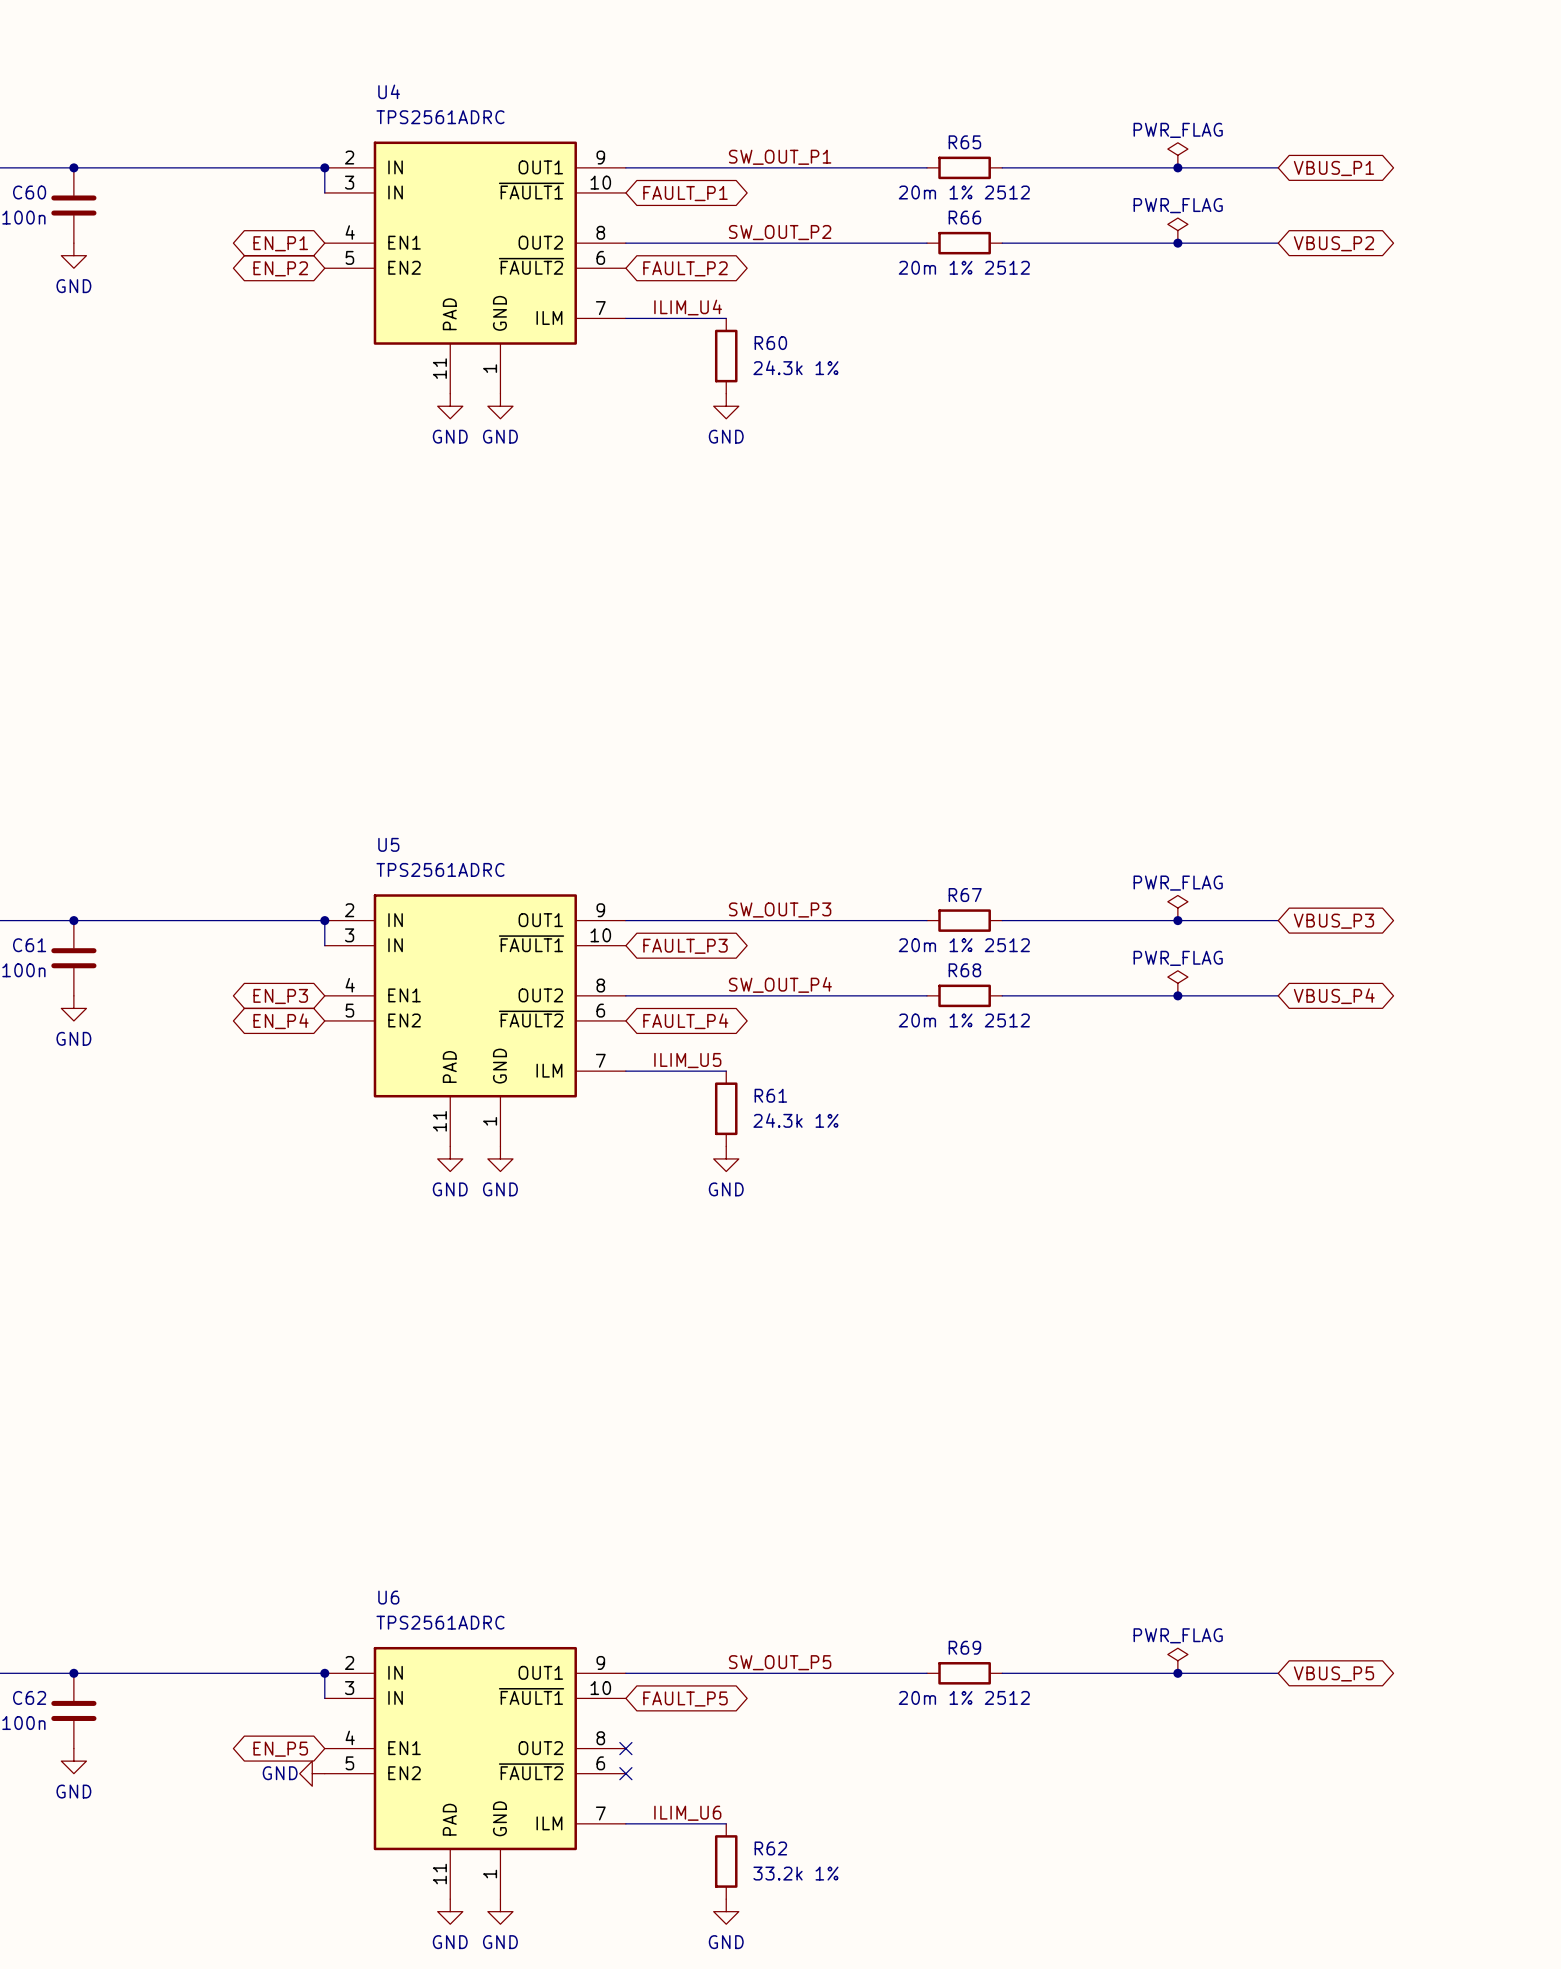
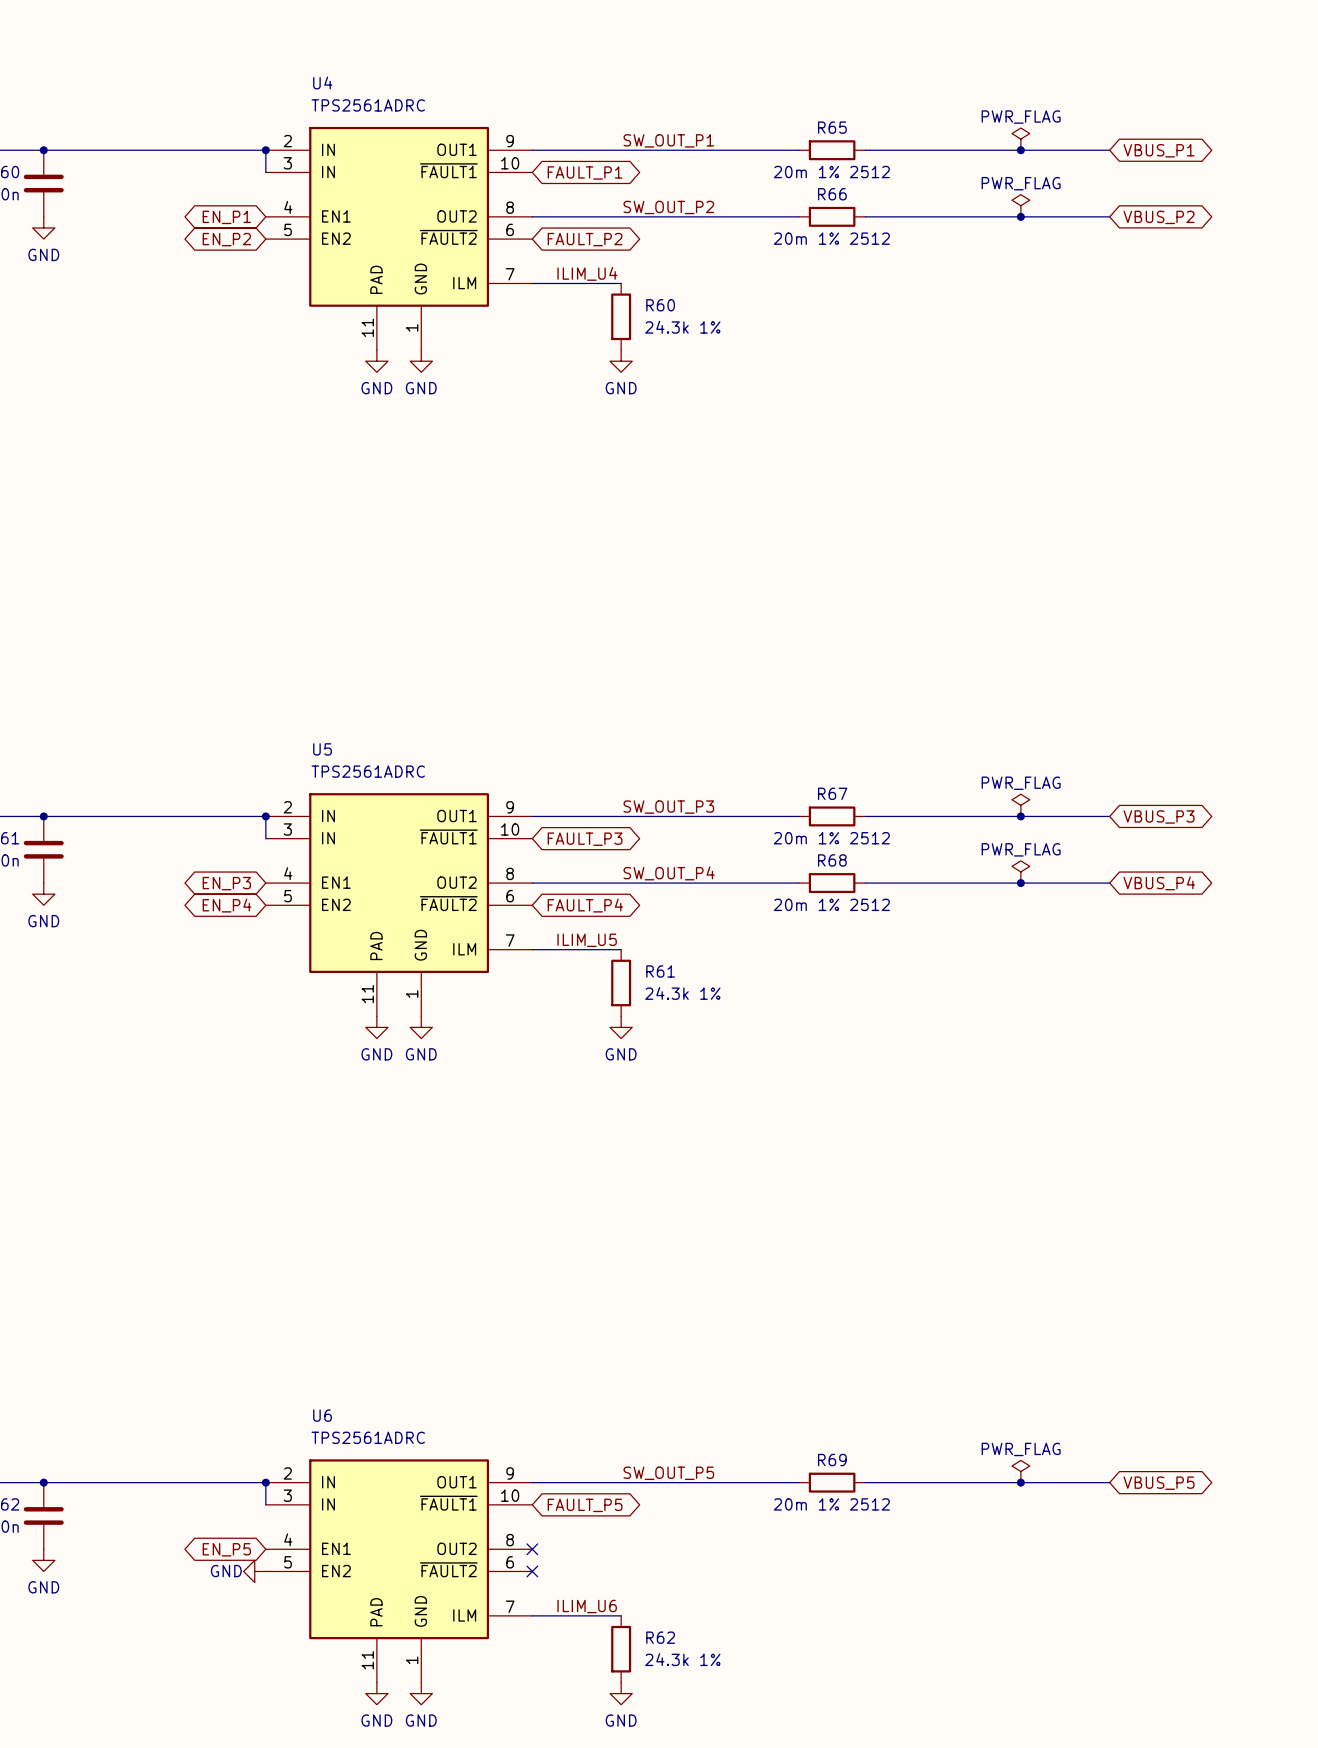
R62 value: 33.2k 1% (795, 1873) -> 24.3k 1% (682, 1659)

